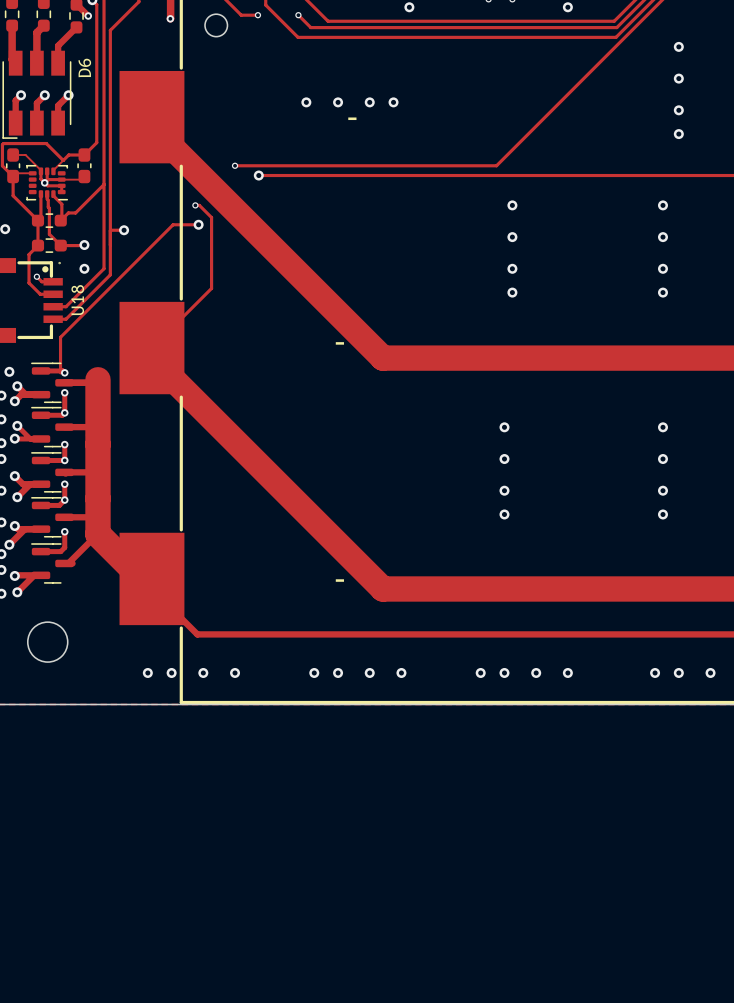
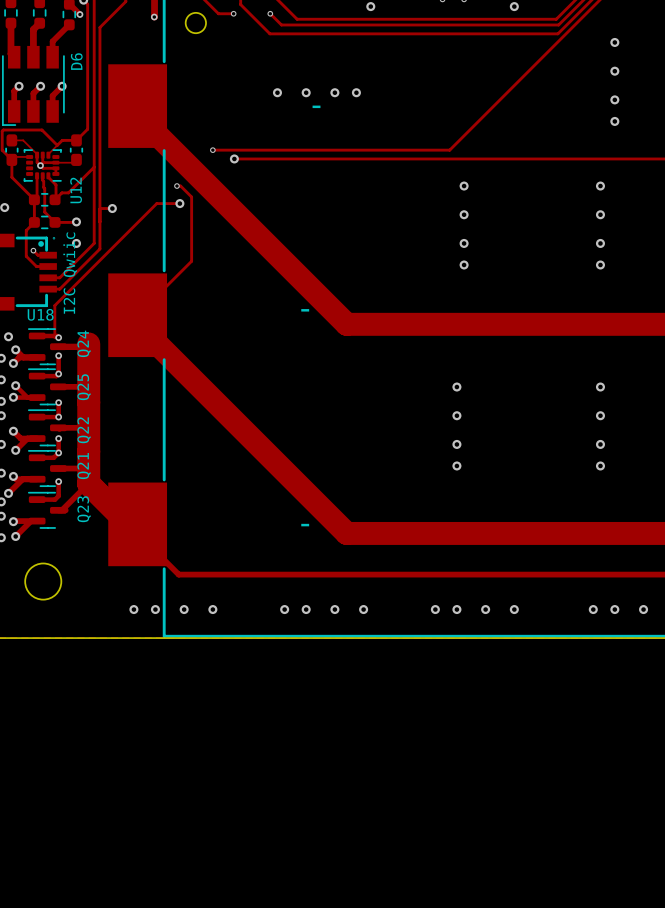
U12 name: none -> U12 (76, 190)
U18 name rotation: 0° (77, 300) -> 90° clockwise (40, 314)
U18 name position: U18 (77, 300) -> U18 (40, 314)
text: none -> I2C Qwiic (70, 273)
Q24 name: none -> Q24 (84, 343)
Q25 name: none -> Q25 (84, 387)
Q22 name: none -> Q22 (84, 430)
Q21 name: none -> Q21 (84, 466)
Q23 name: none -> Q23 (84, 509)

